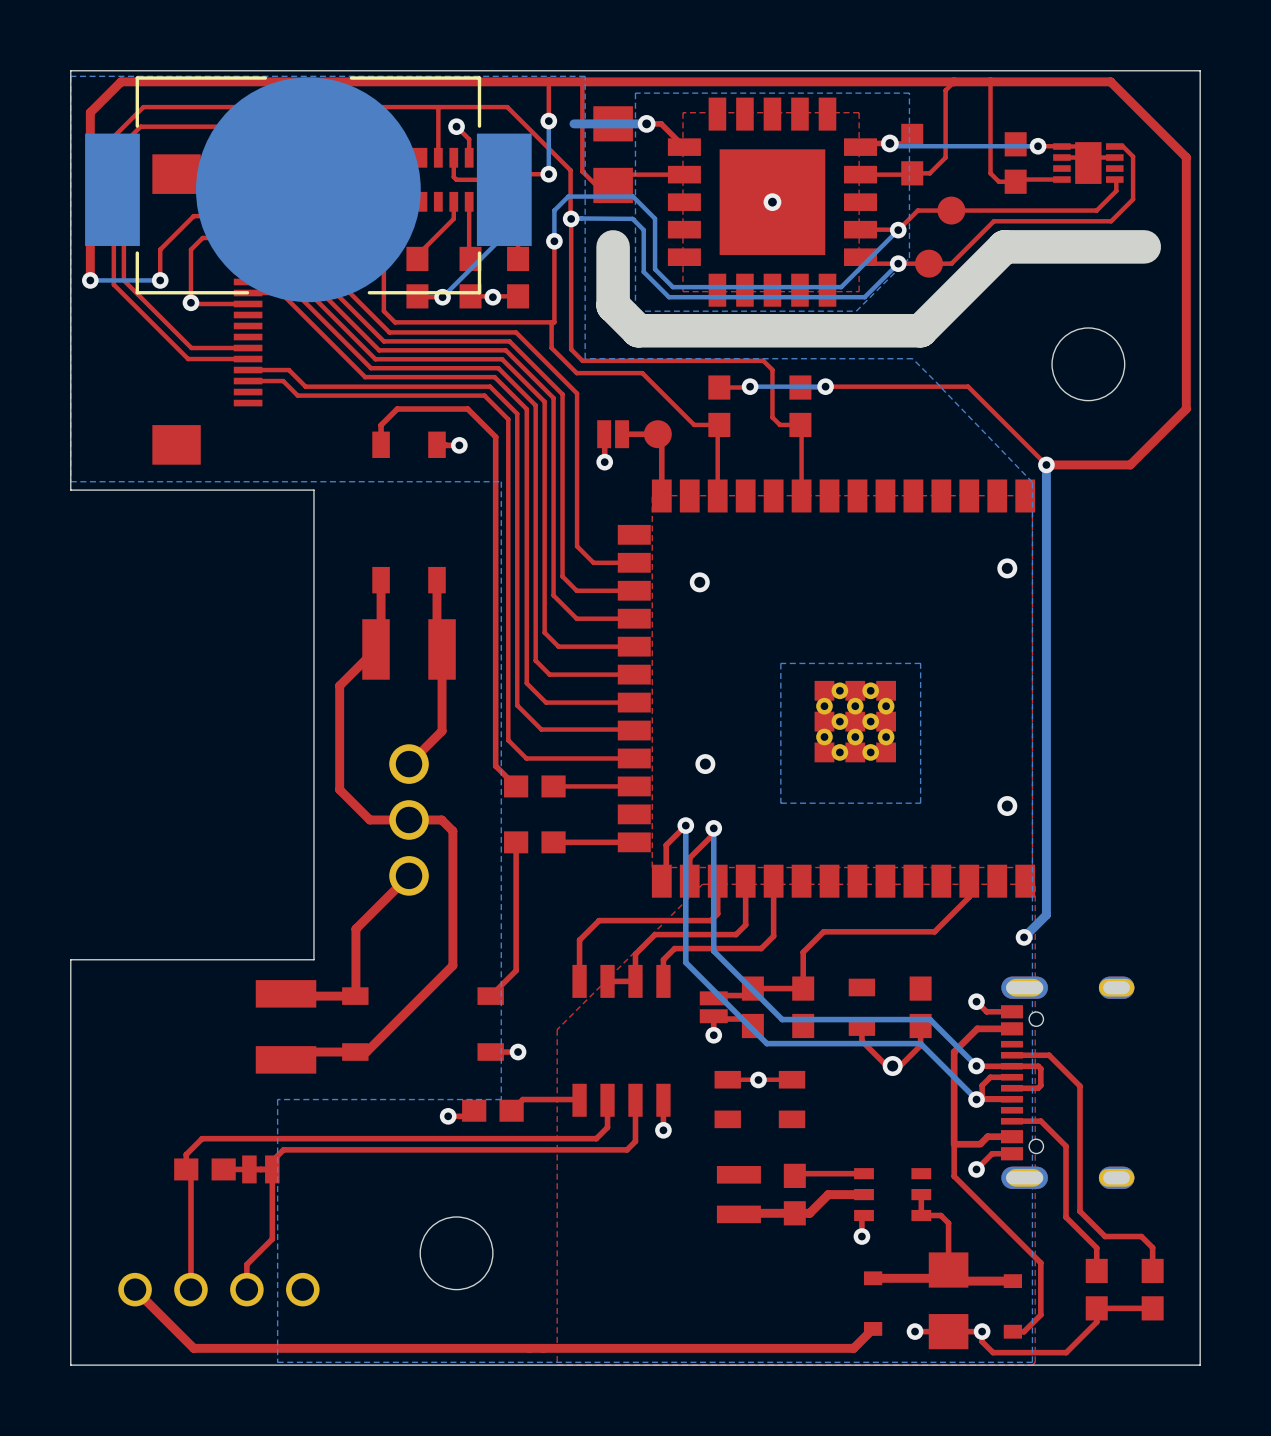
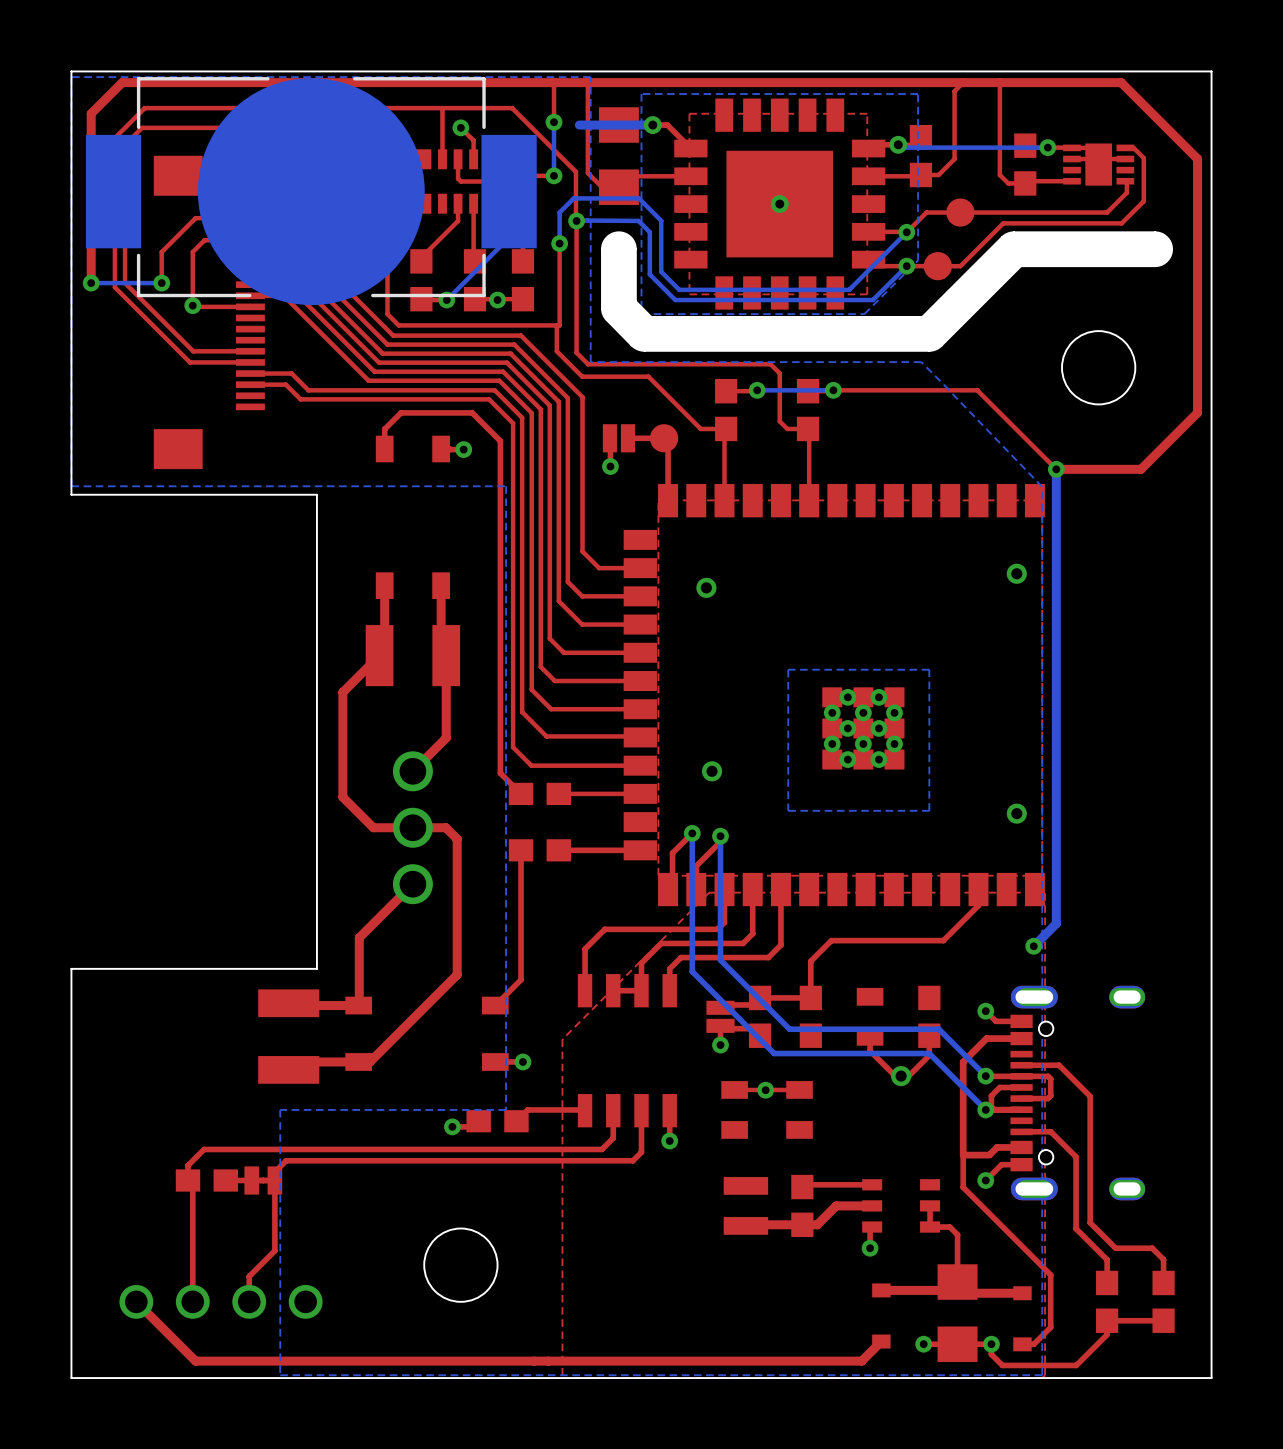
board edge: none -> (1155, 232) (1007, 233) (922, 316) (651, 316) (635, 301) (634, 242) (627, 234) (616, 232) (606, 237) (602, 247) (602, 310) (605, 318) (631, 345) (642, 350) (931, 350) (941, 345) (1021, 266) (1159, 265) (1169, 257) (1171, 247) (1165, 235) (1155, 232)

